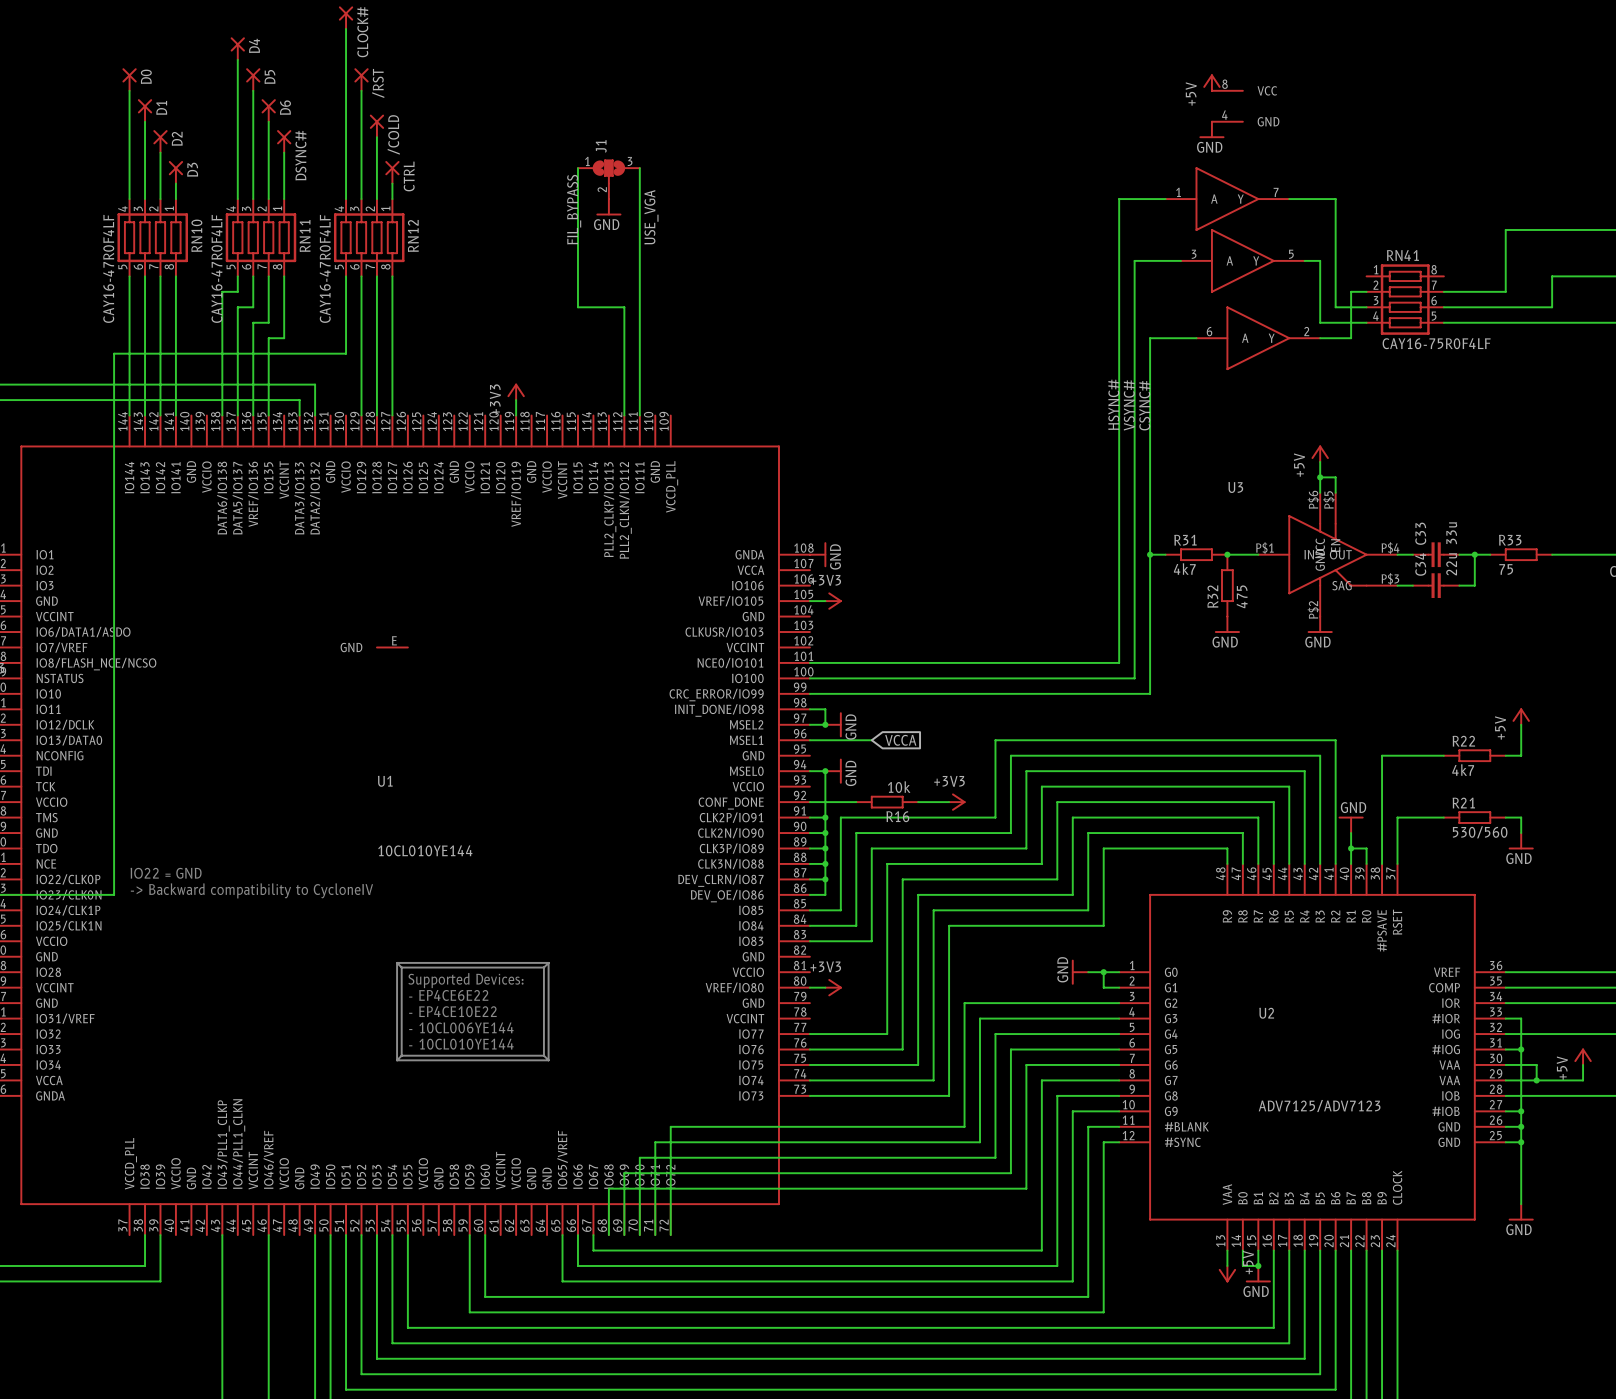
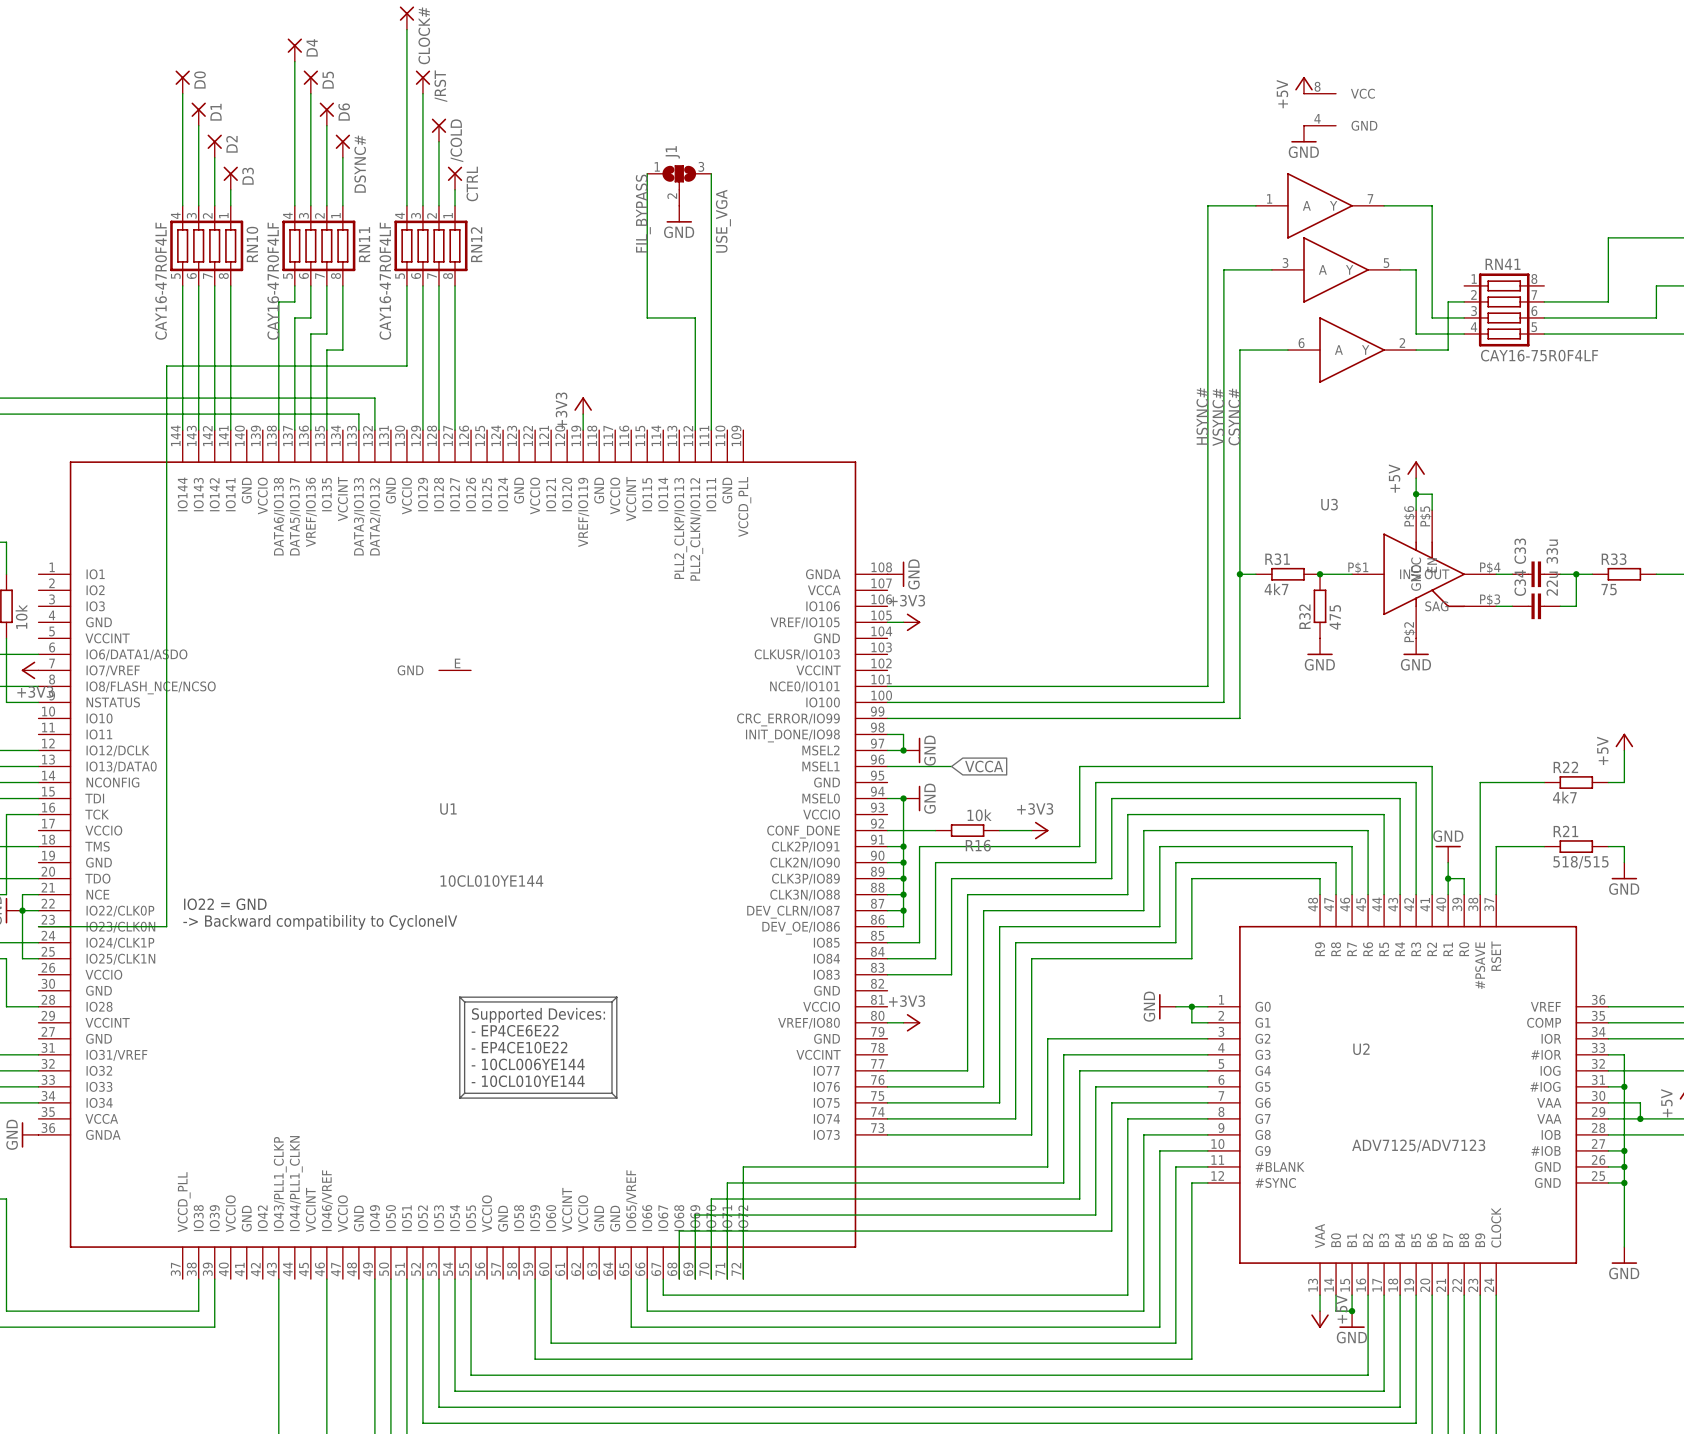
R21 value: 530/560 (1480, 832) -> 518/515 (1580, 862)

